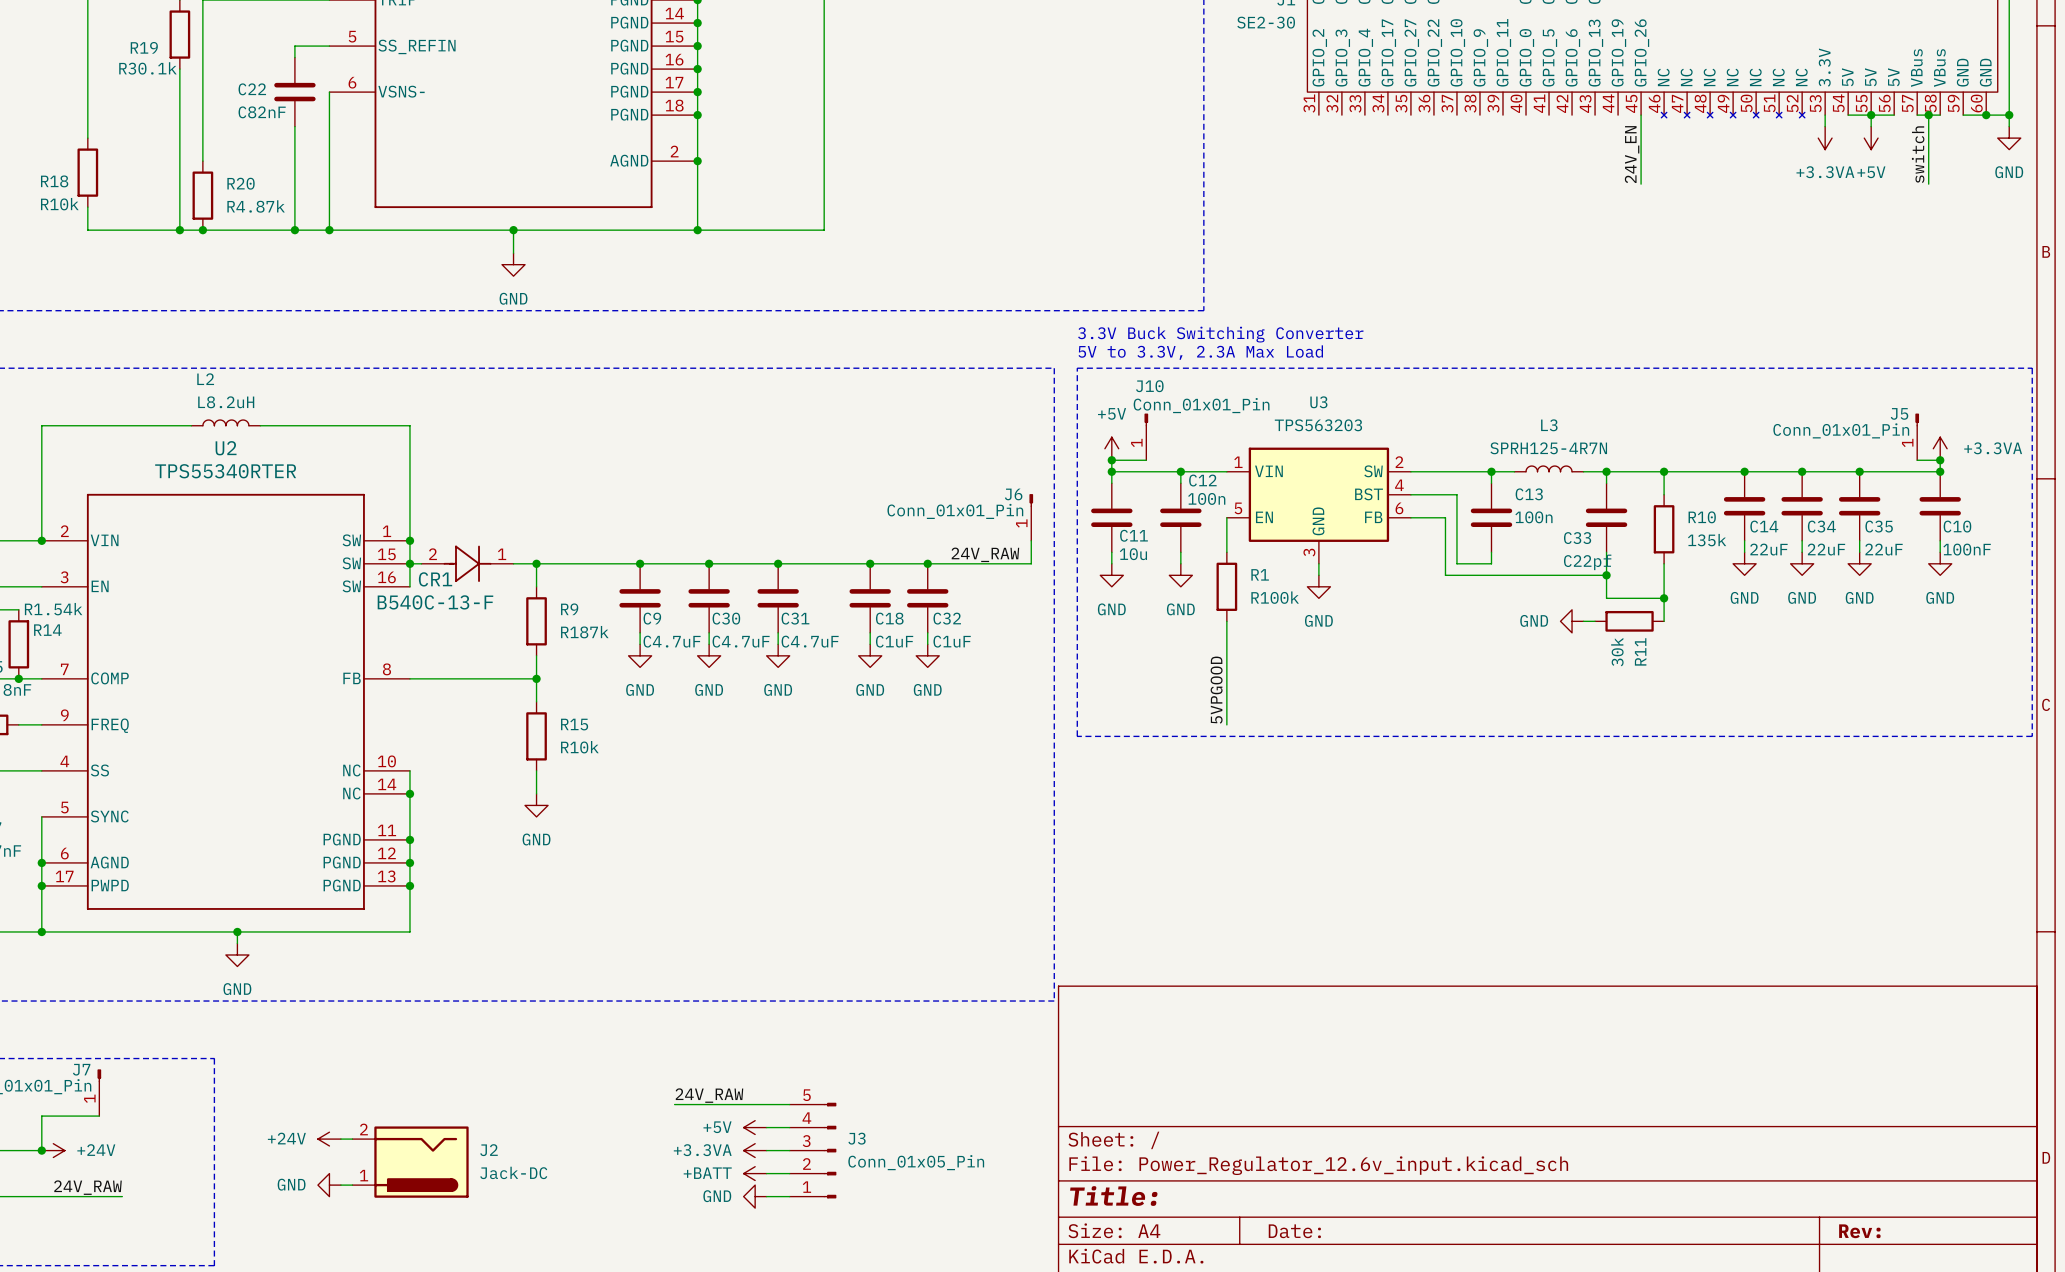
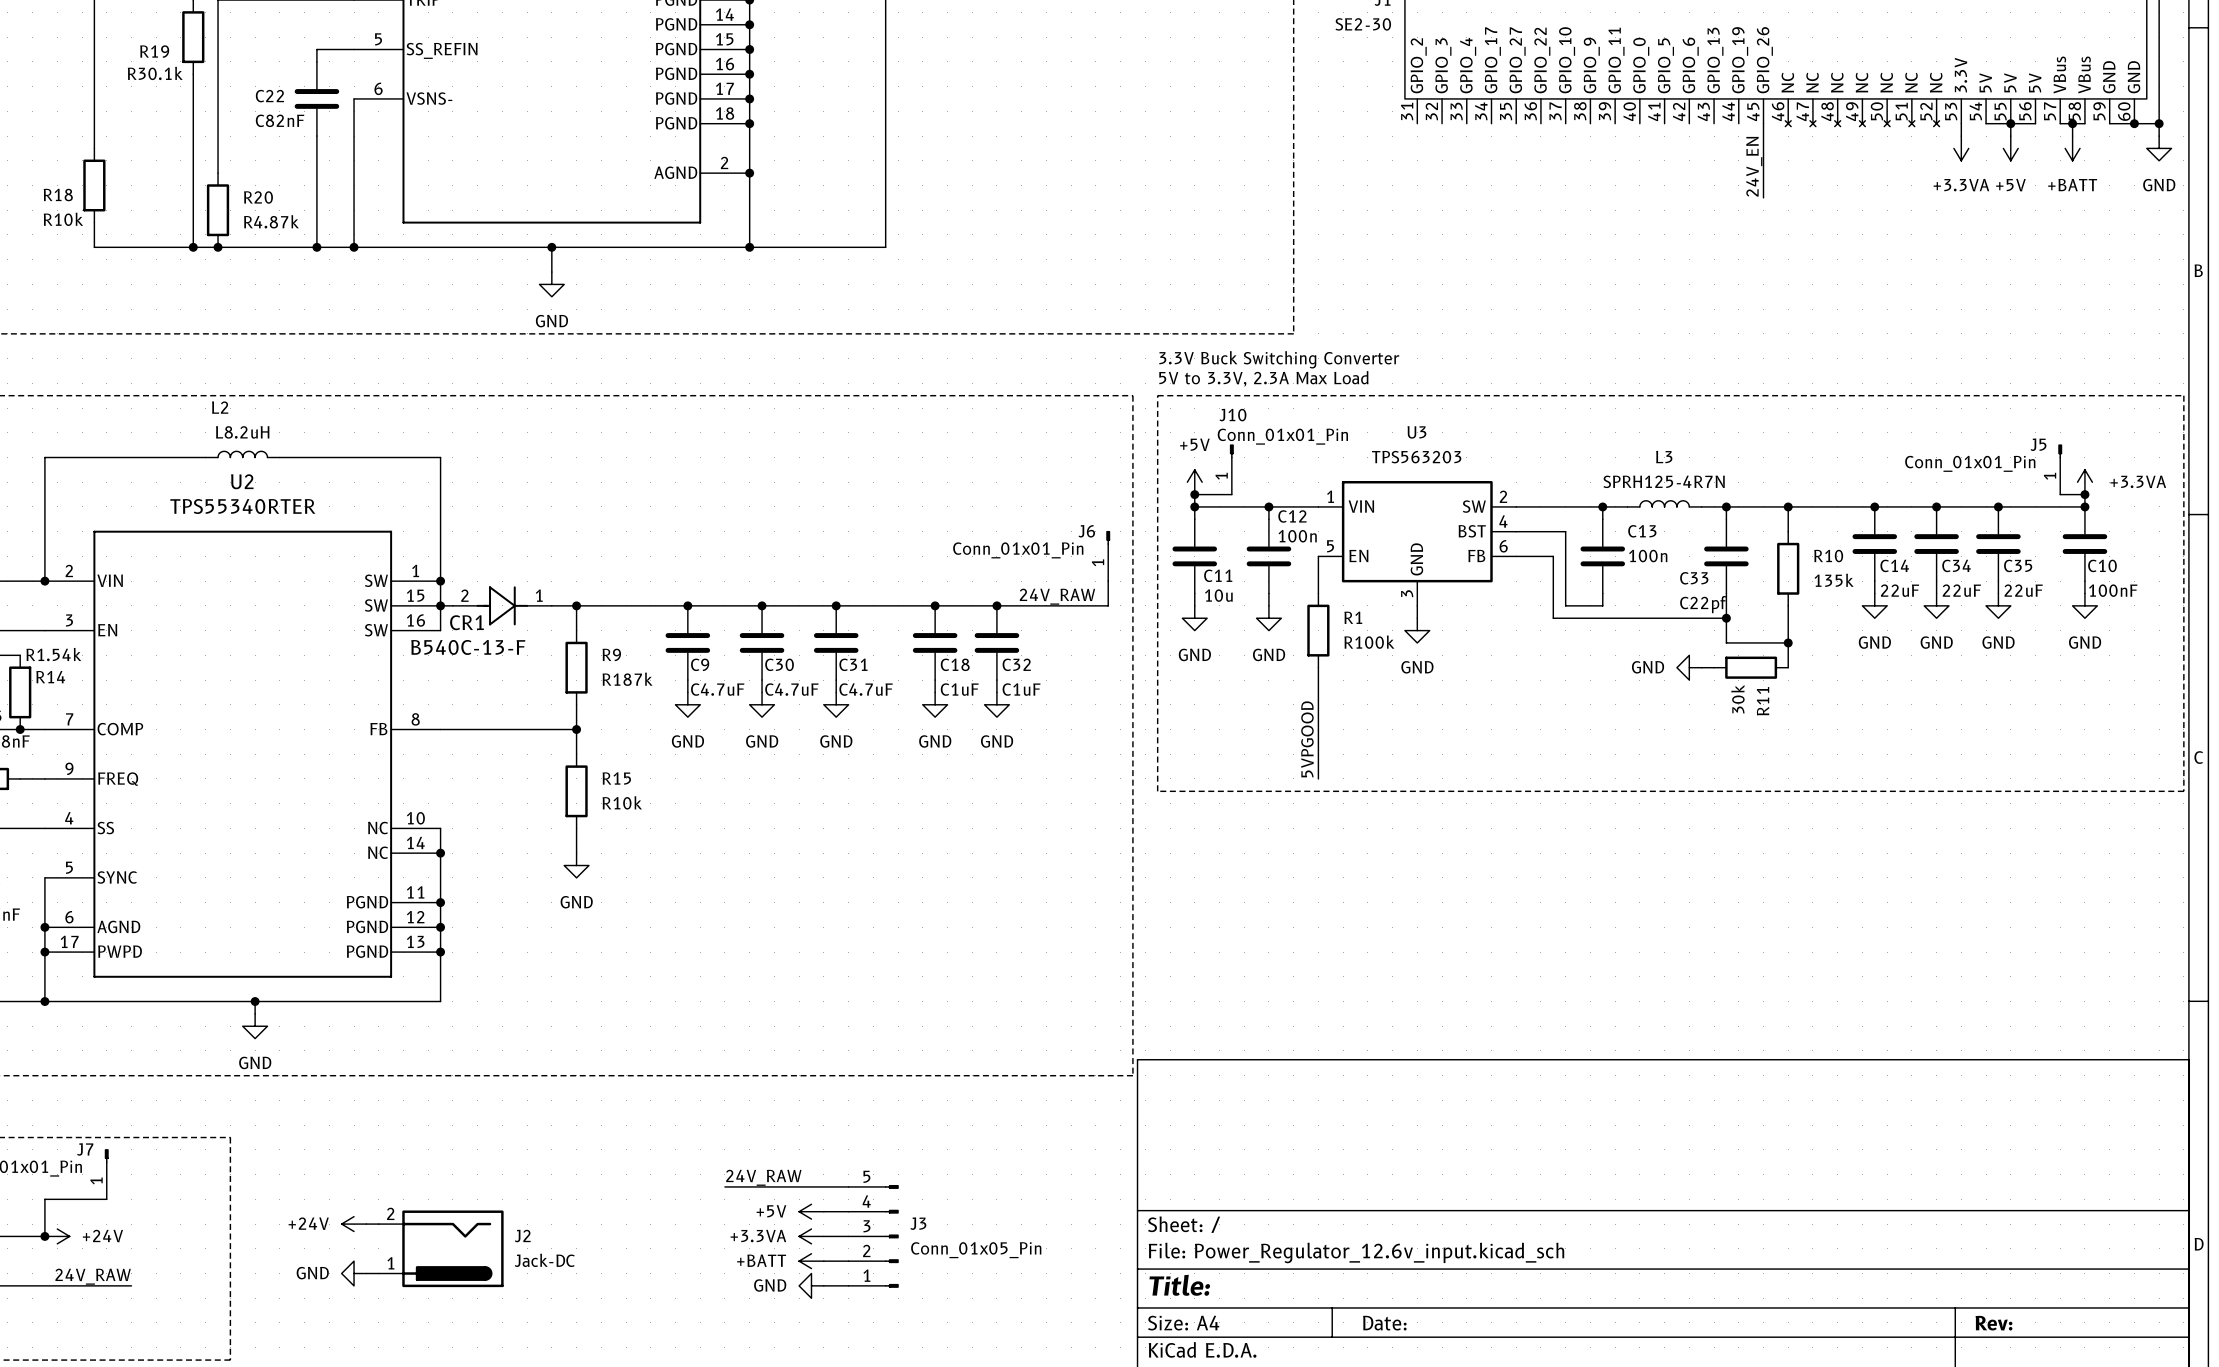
wire: (1928, 126) (1928, 184) -> none
power symbol: none -> +BATT (2072, 148)
label: switch (1918, 154) -> none

